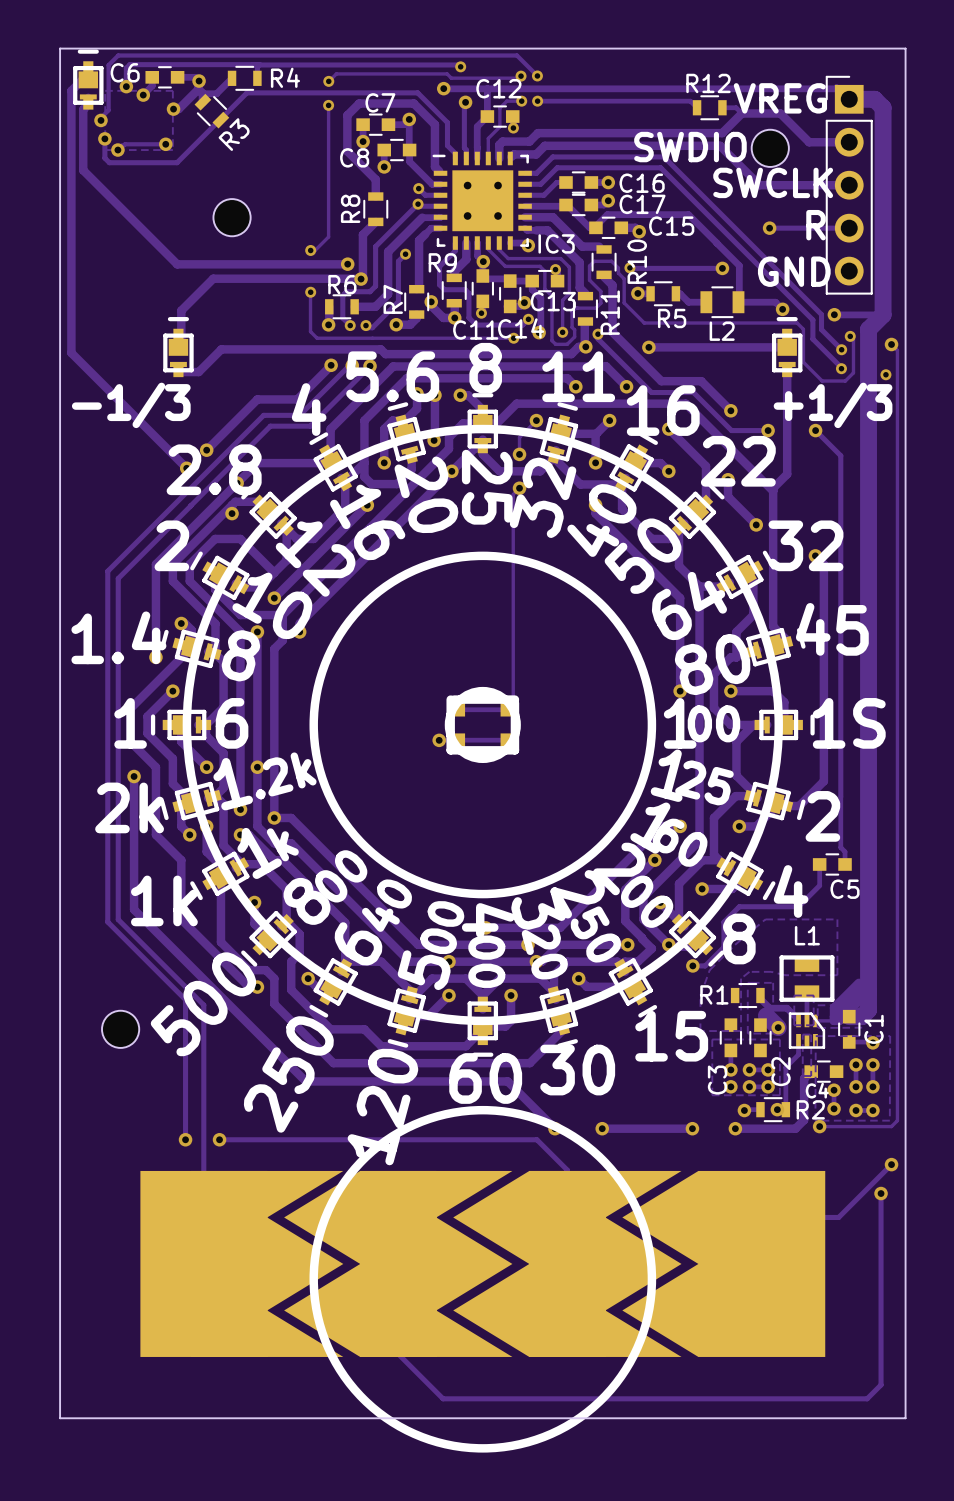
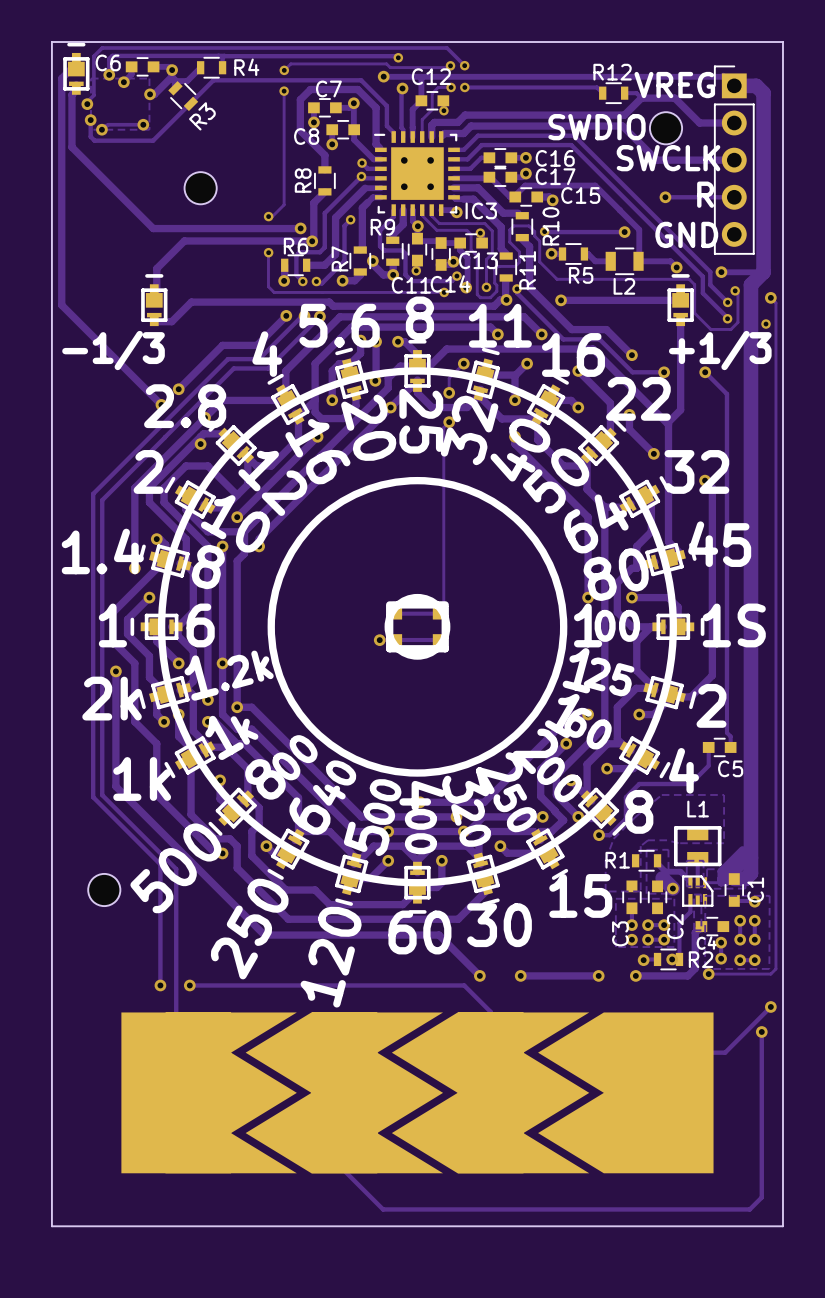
drawing: [309, 1105, 657, 1453] -> none

